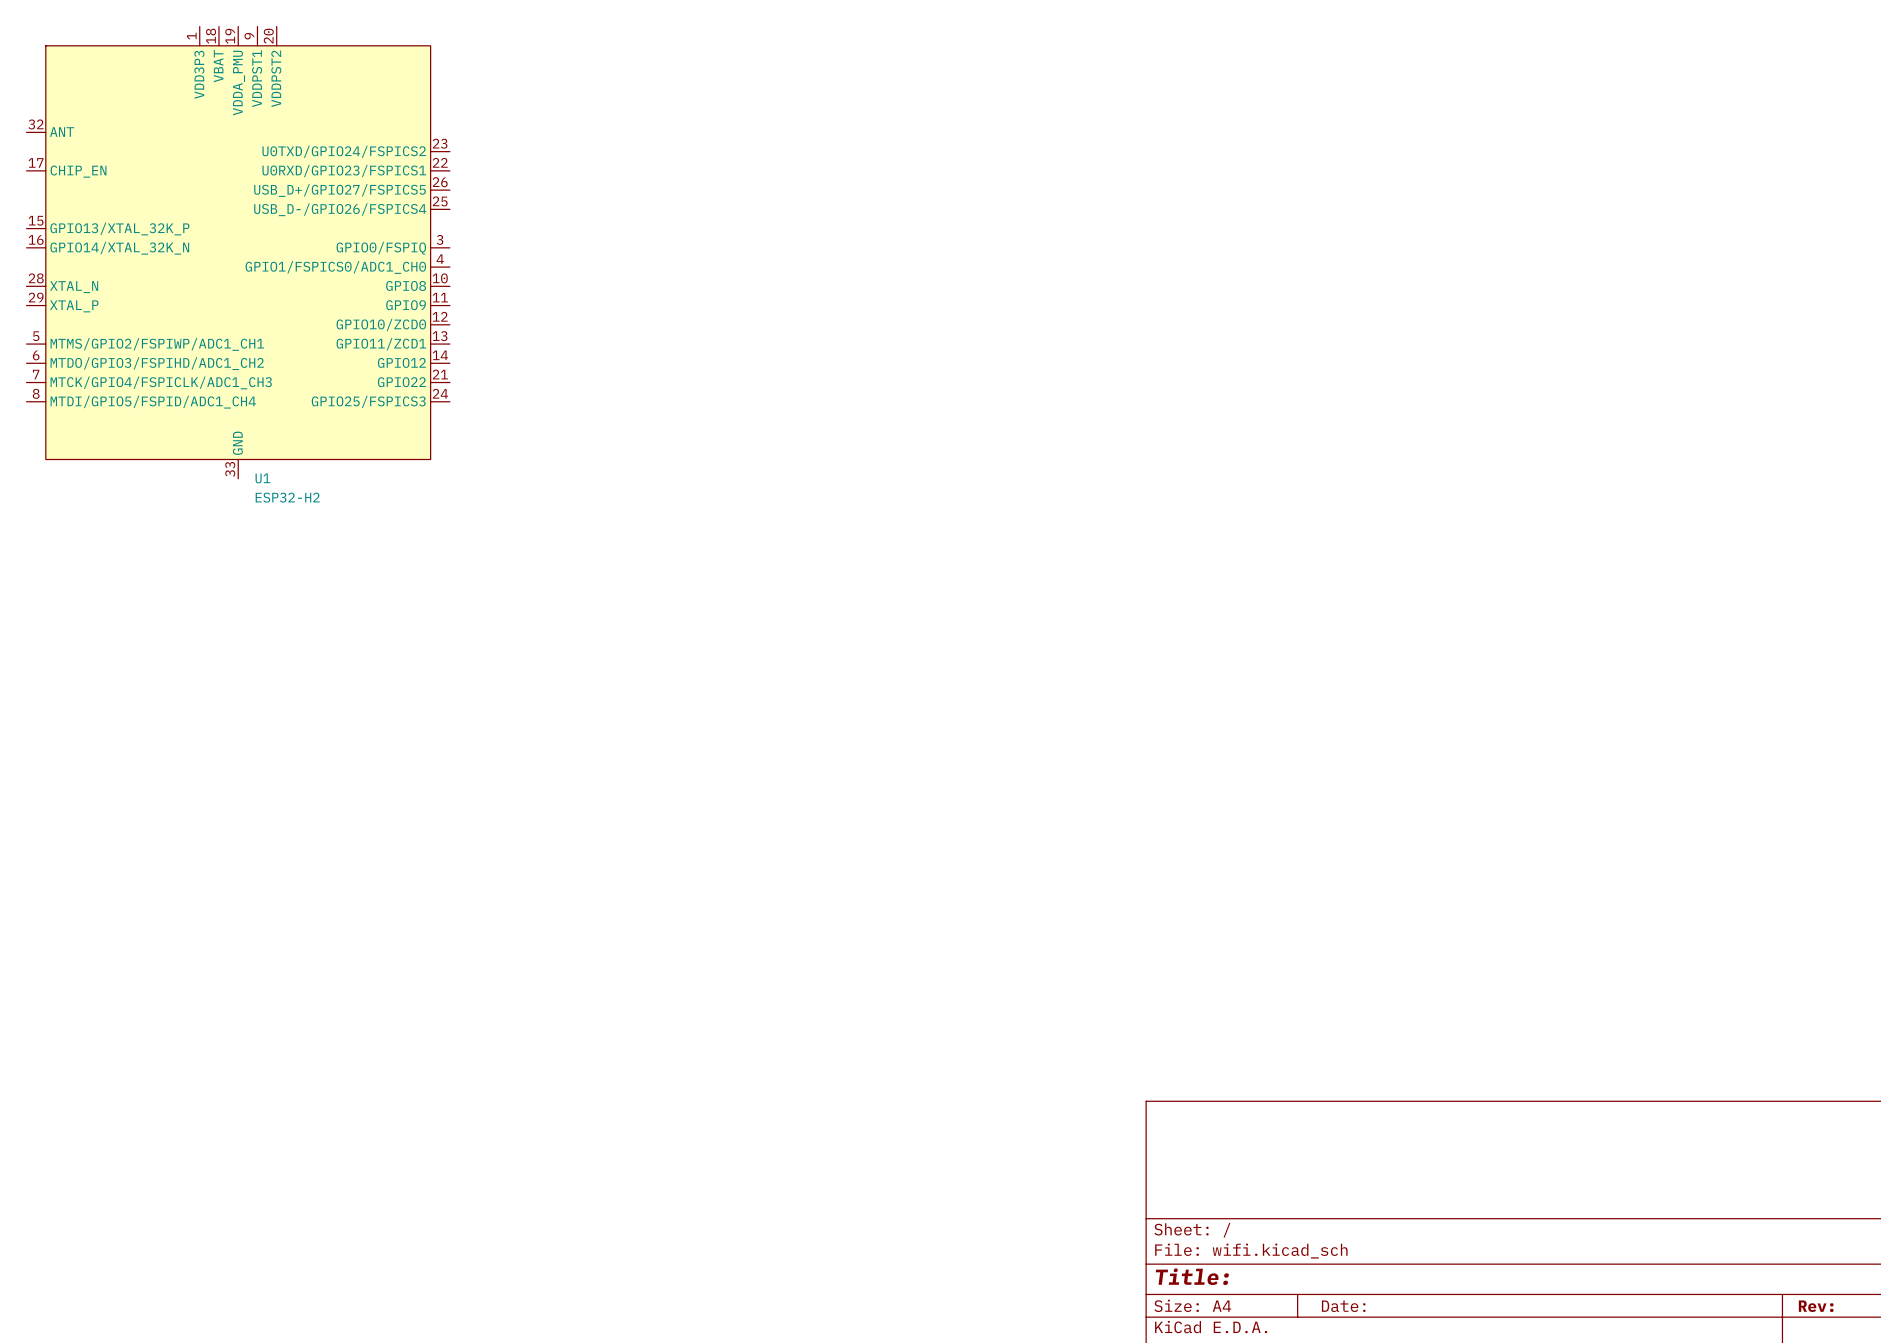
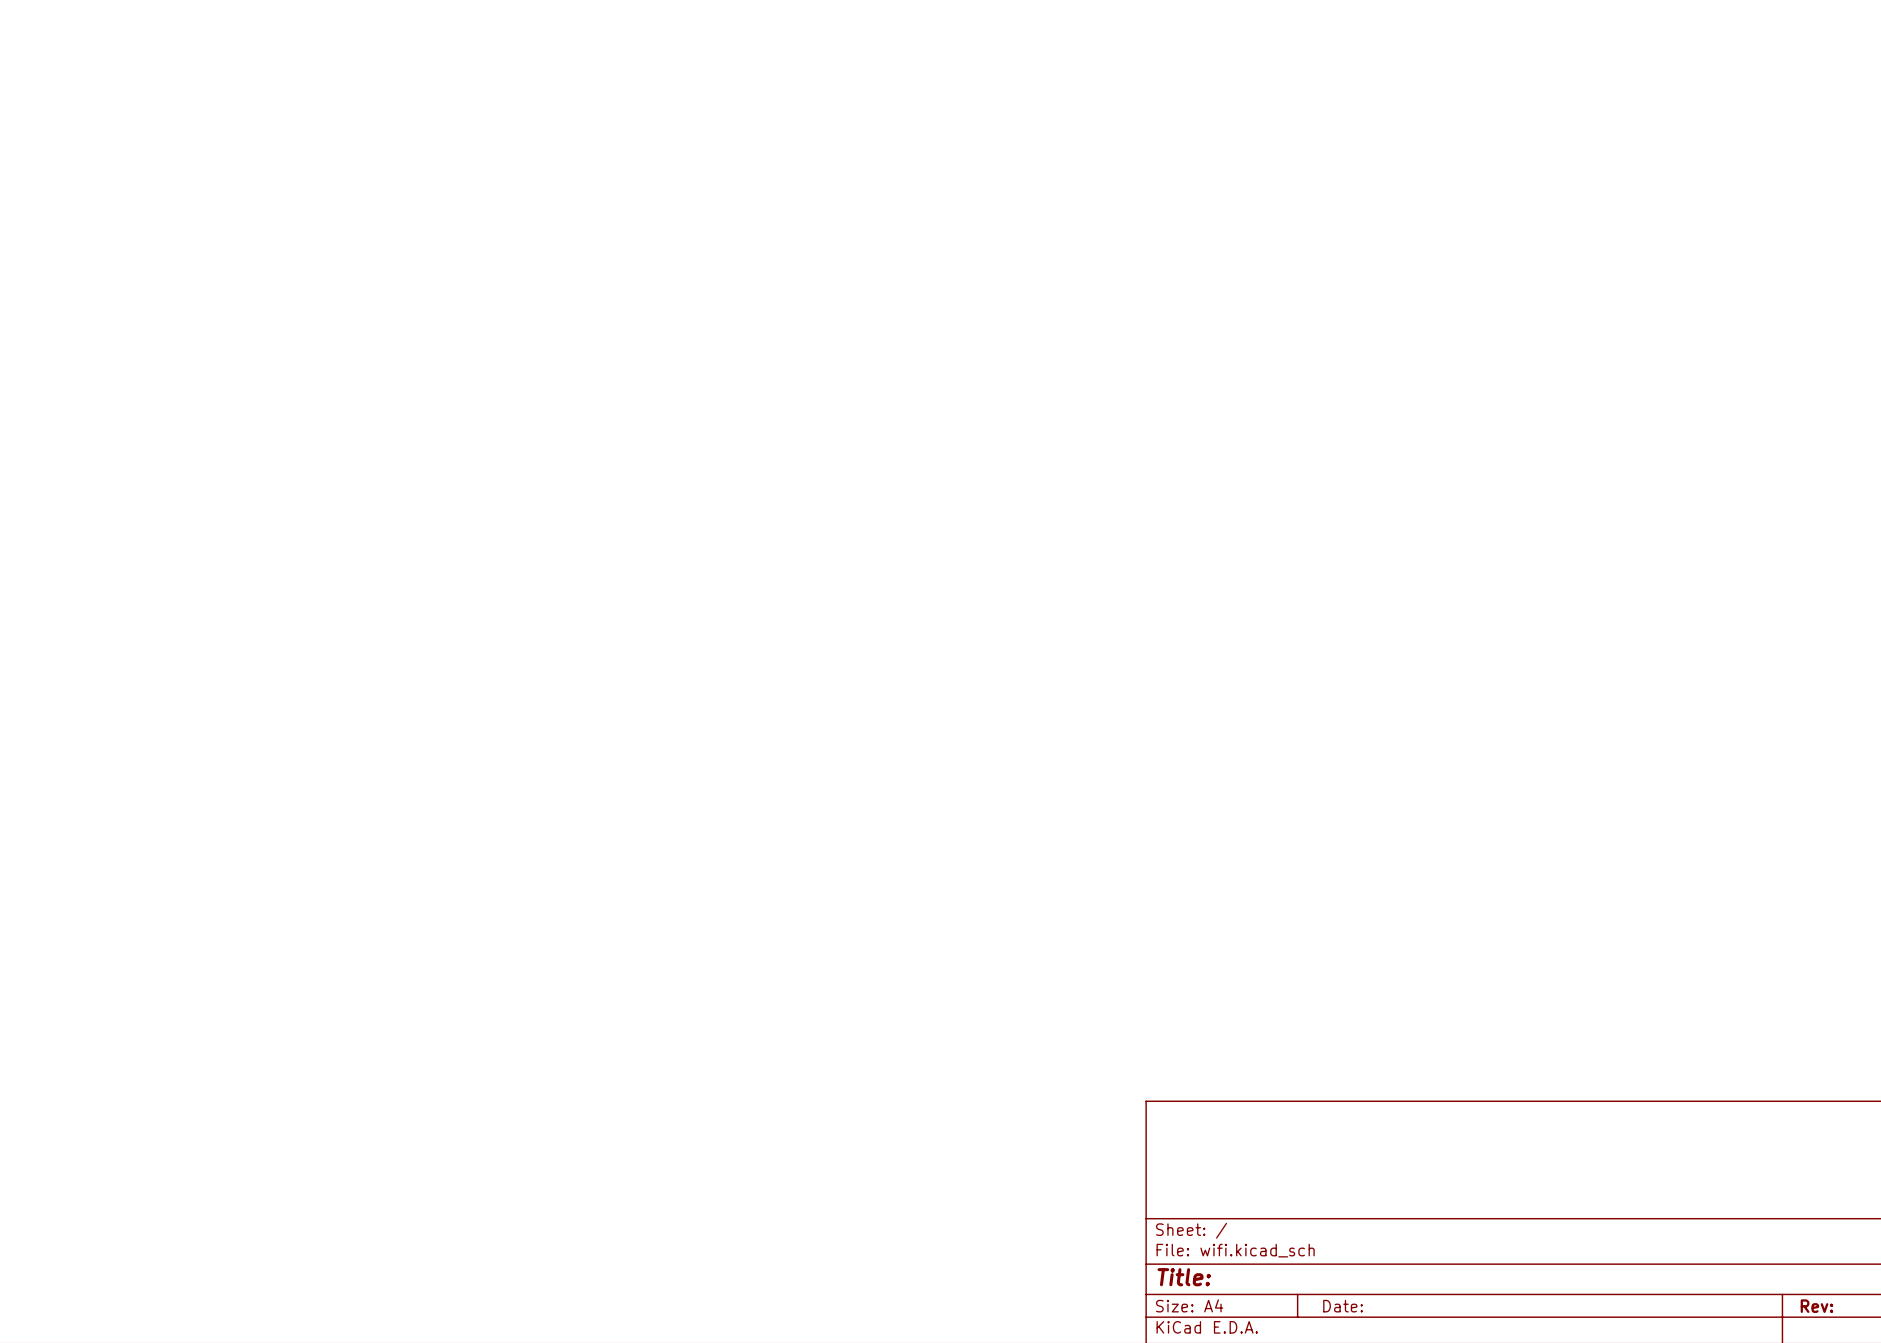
U1: ESP32-H2 (238, 252) -> none

